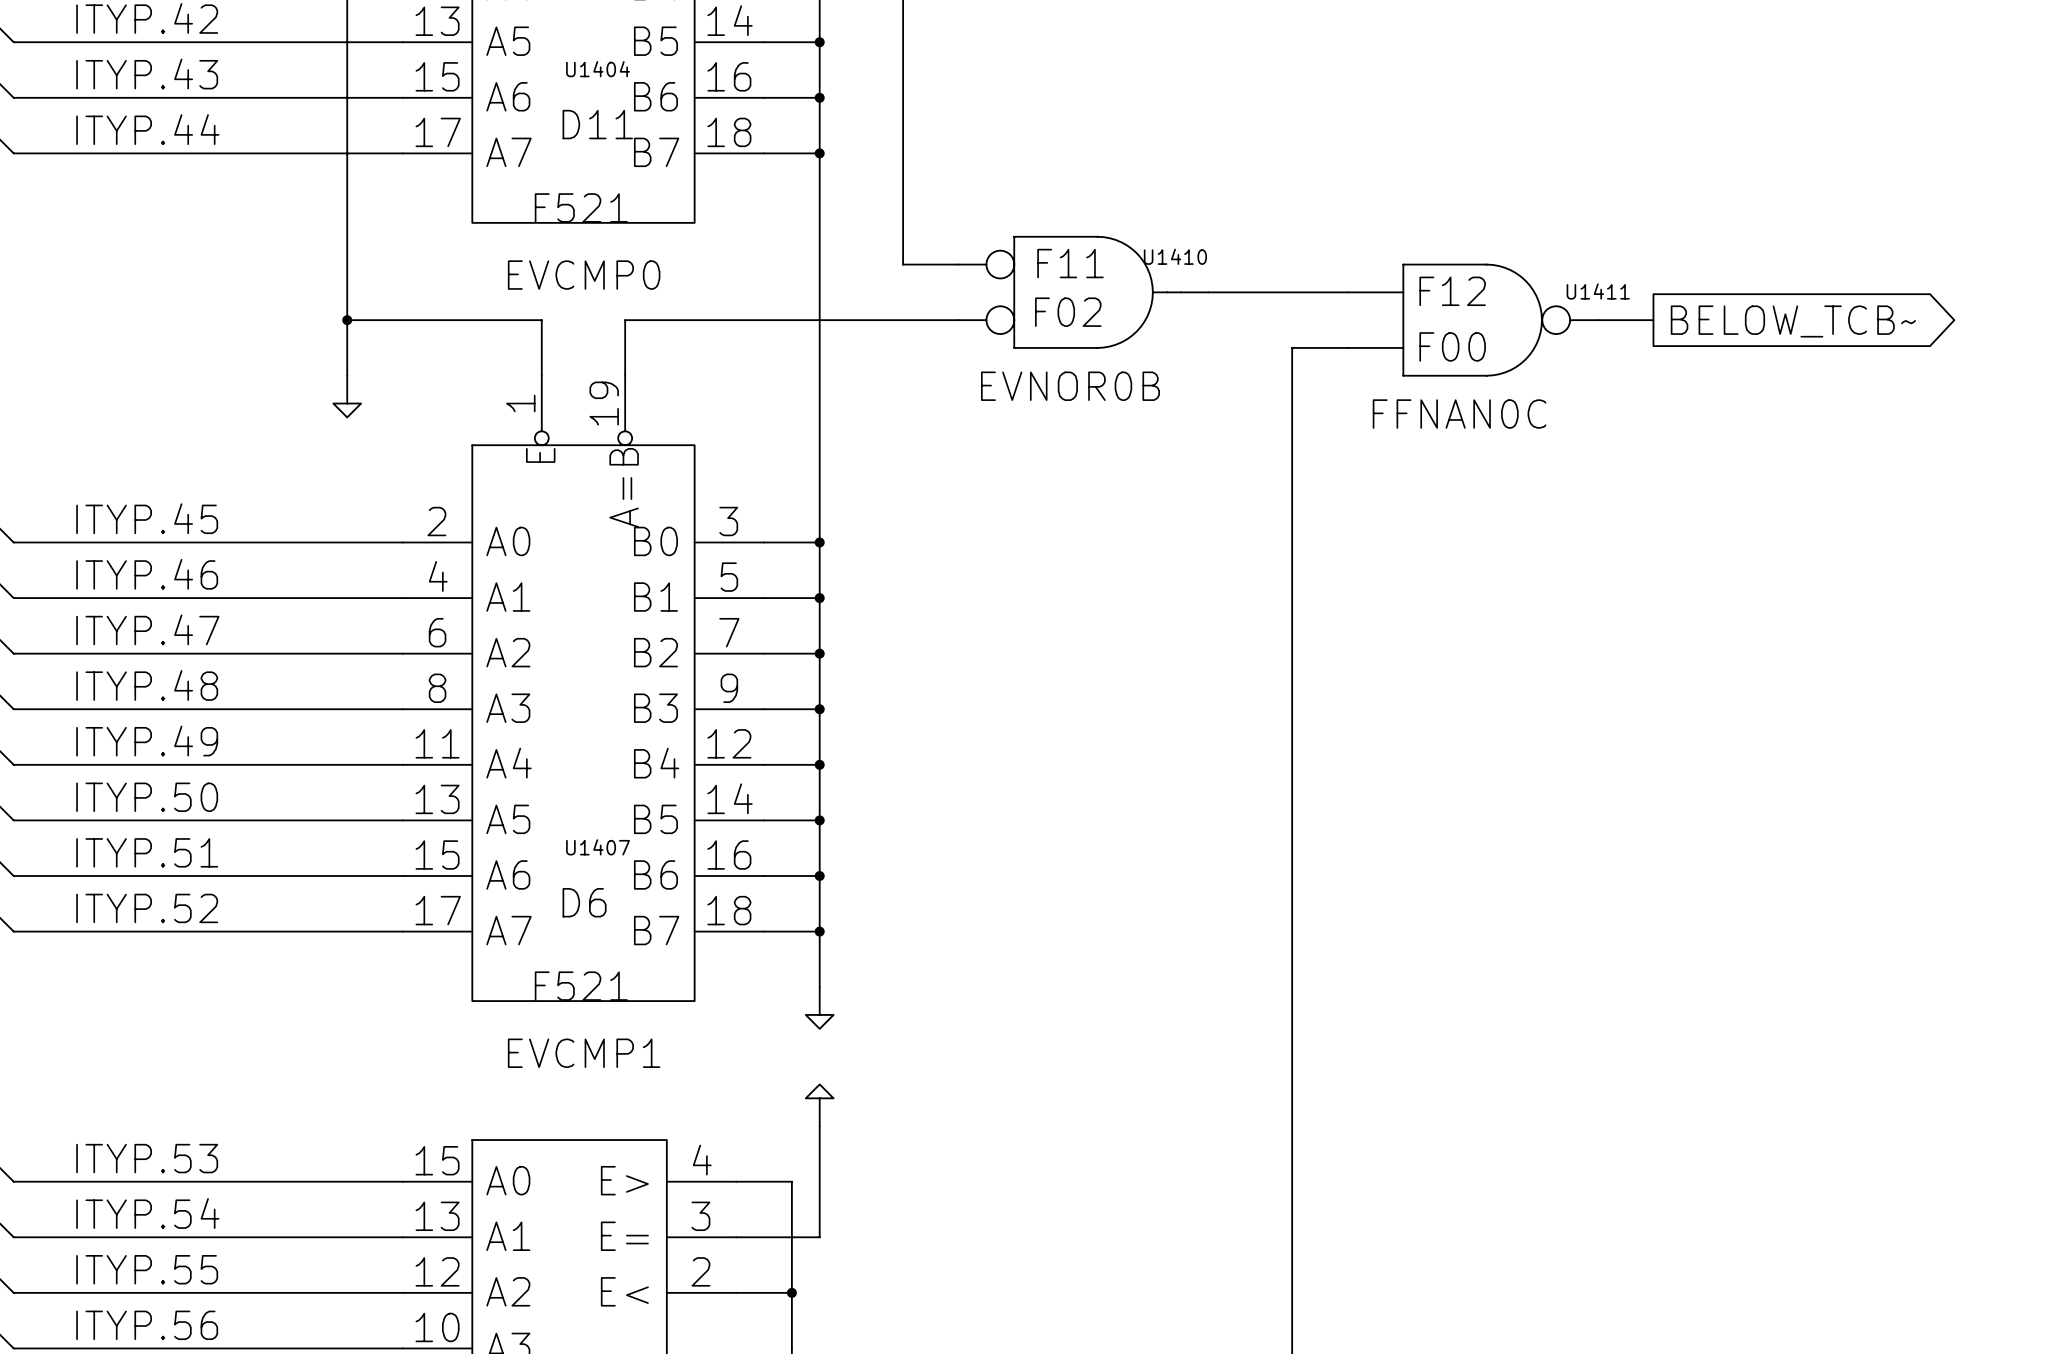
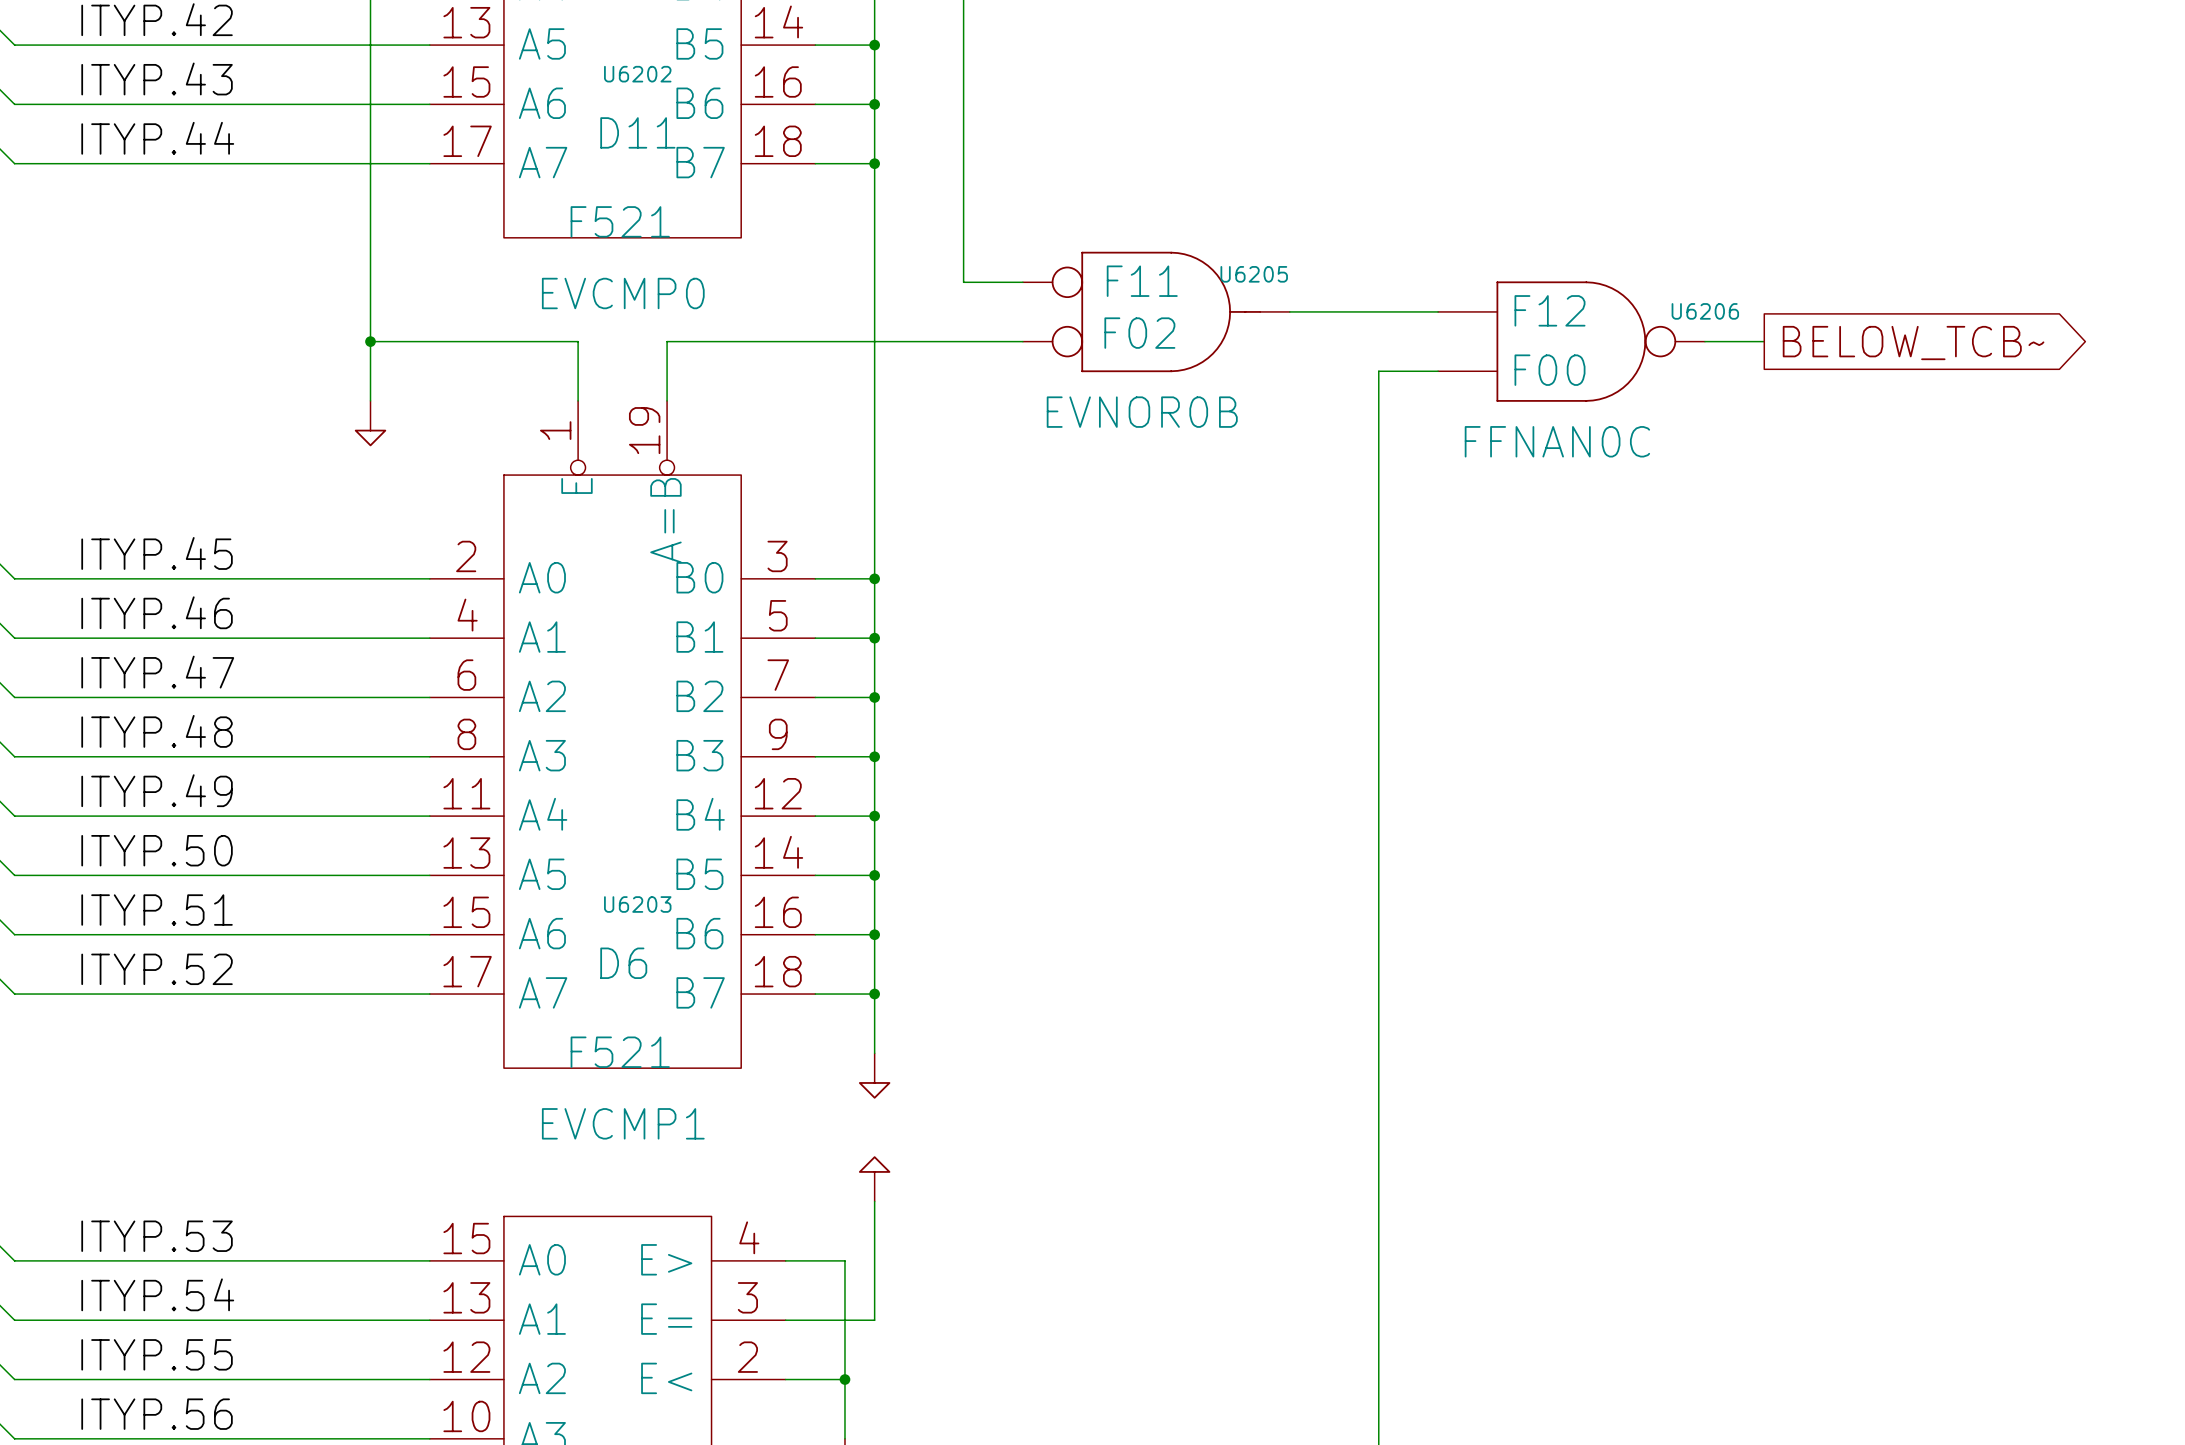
U1404 name: U1404 (598, 69) -> U6202 (637, 74)
U1410 name: U1410 (1175, 256) -> U6205 (1254, 274)
U1411 name: U1411 (1598, 291) -> U6206 (1705, 311)
U1407 name: U1407 (598, 847) -> U6203 (637, 904)

